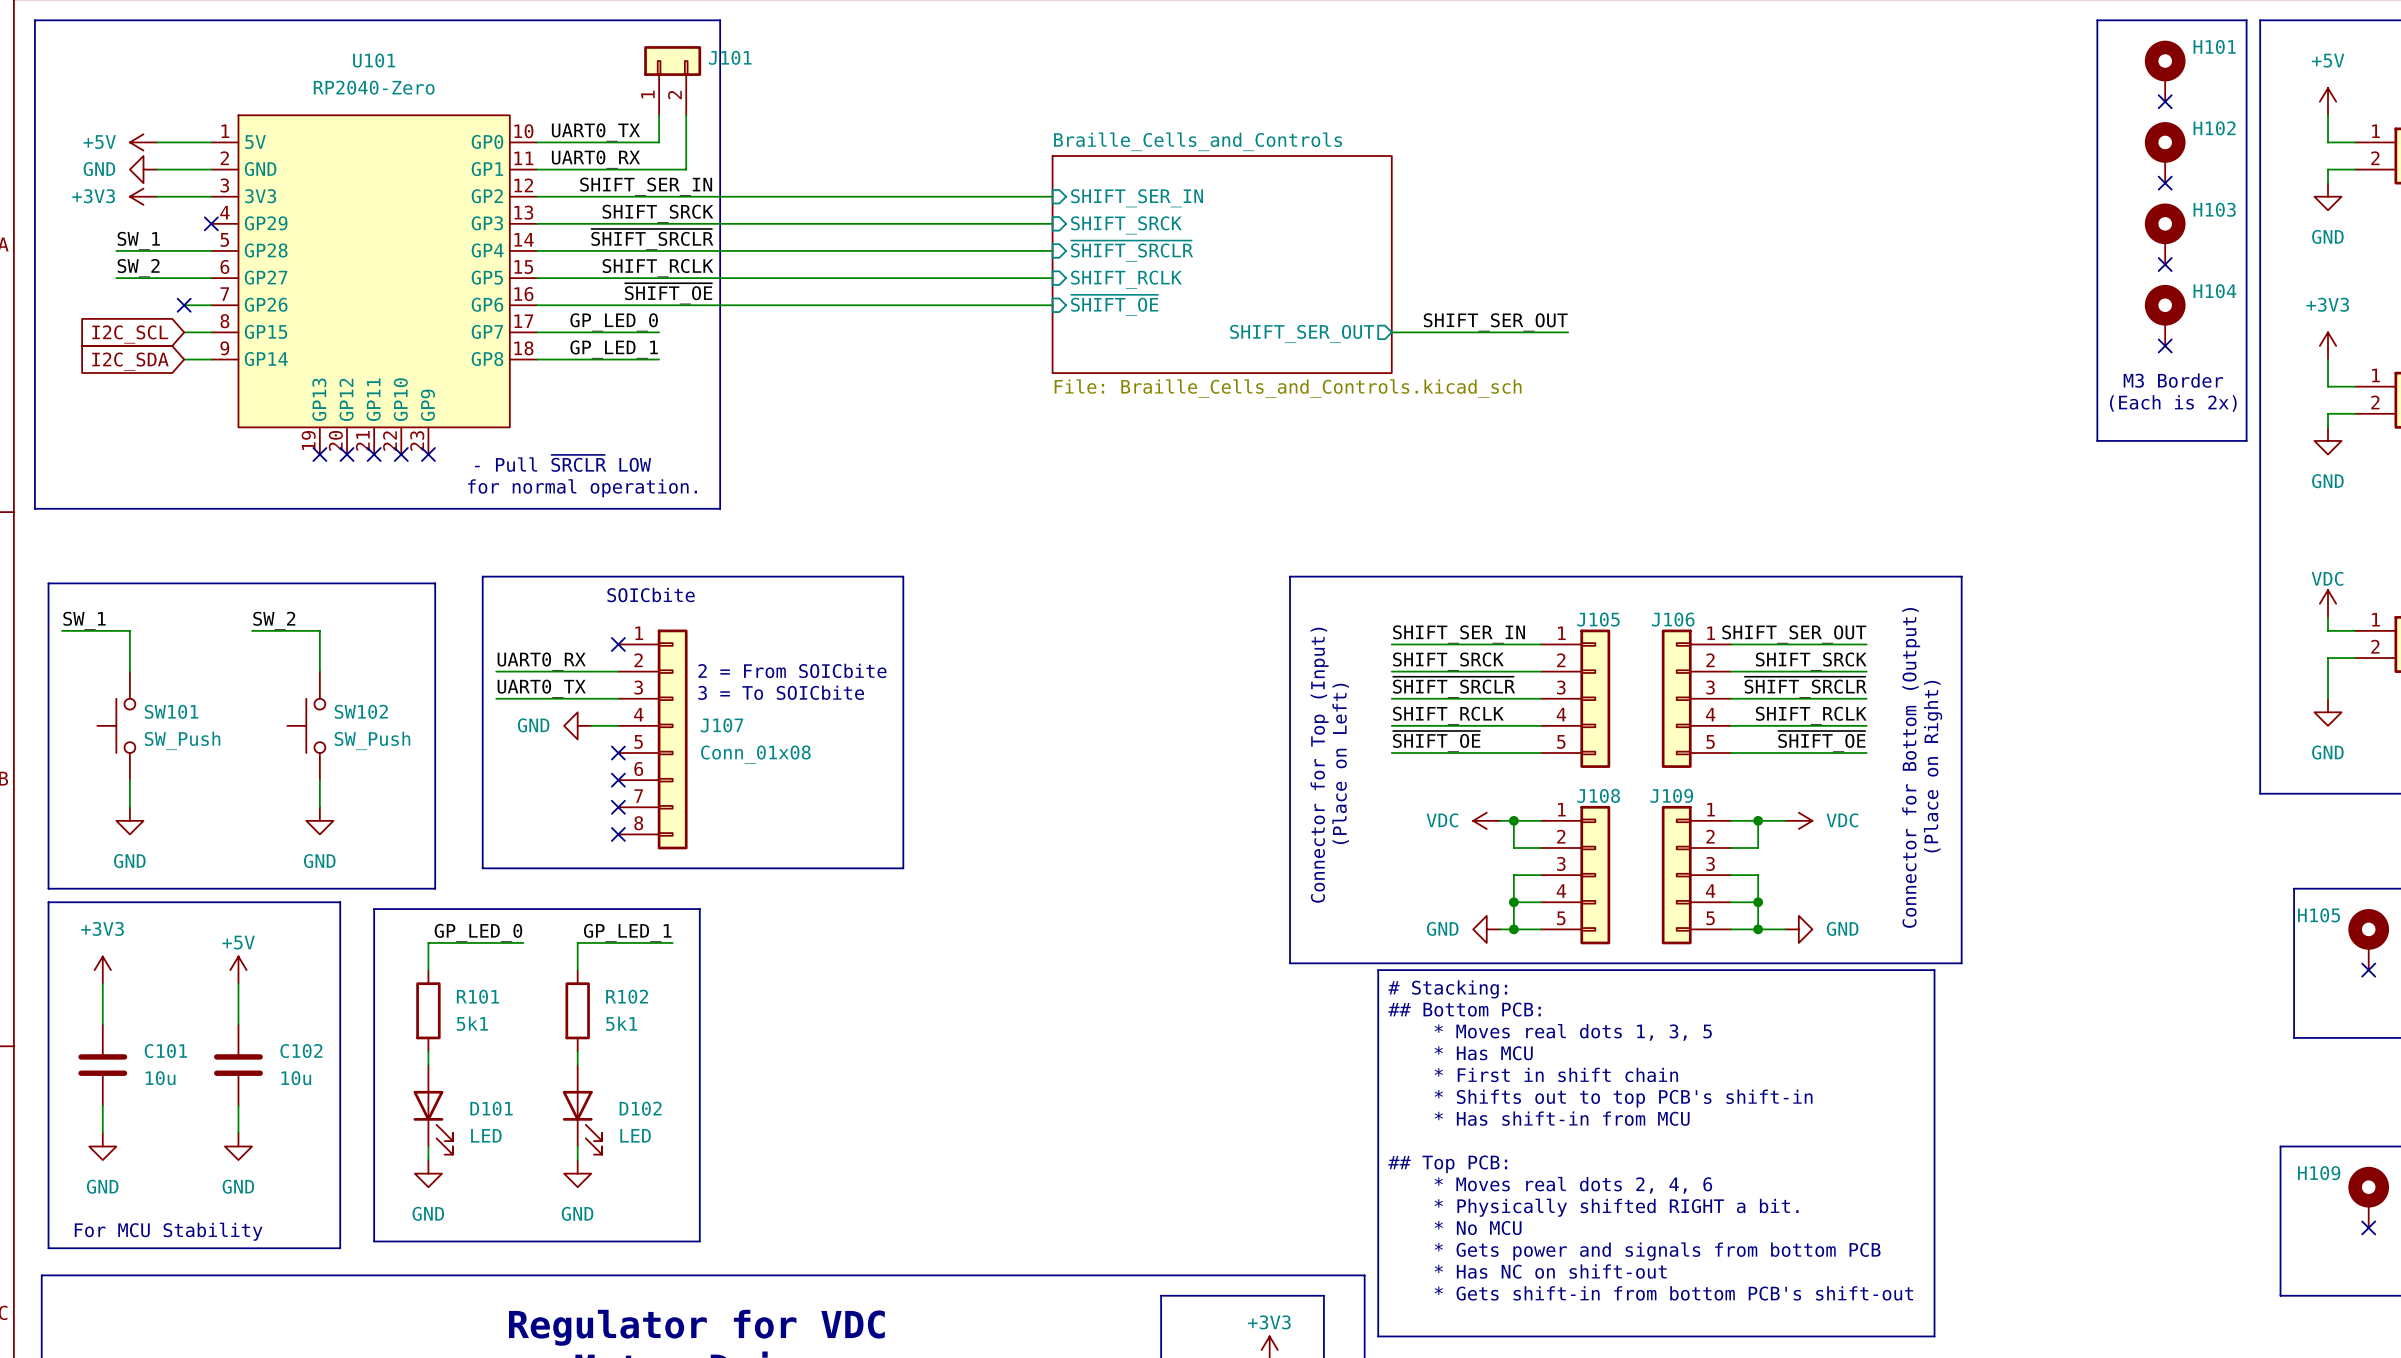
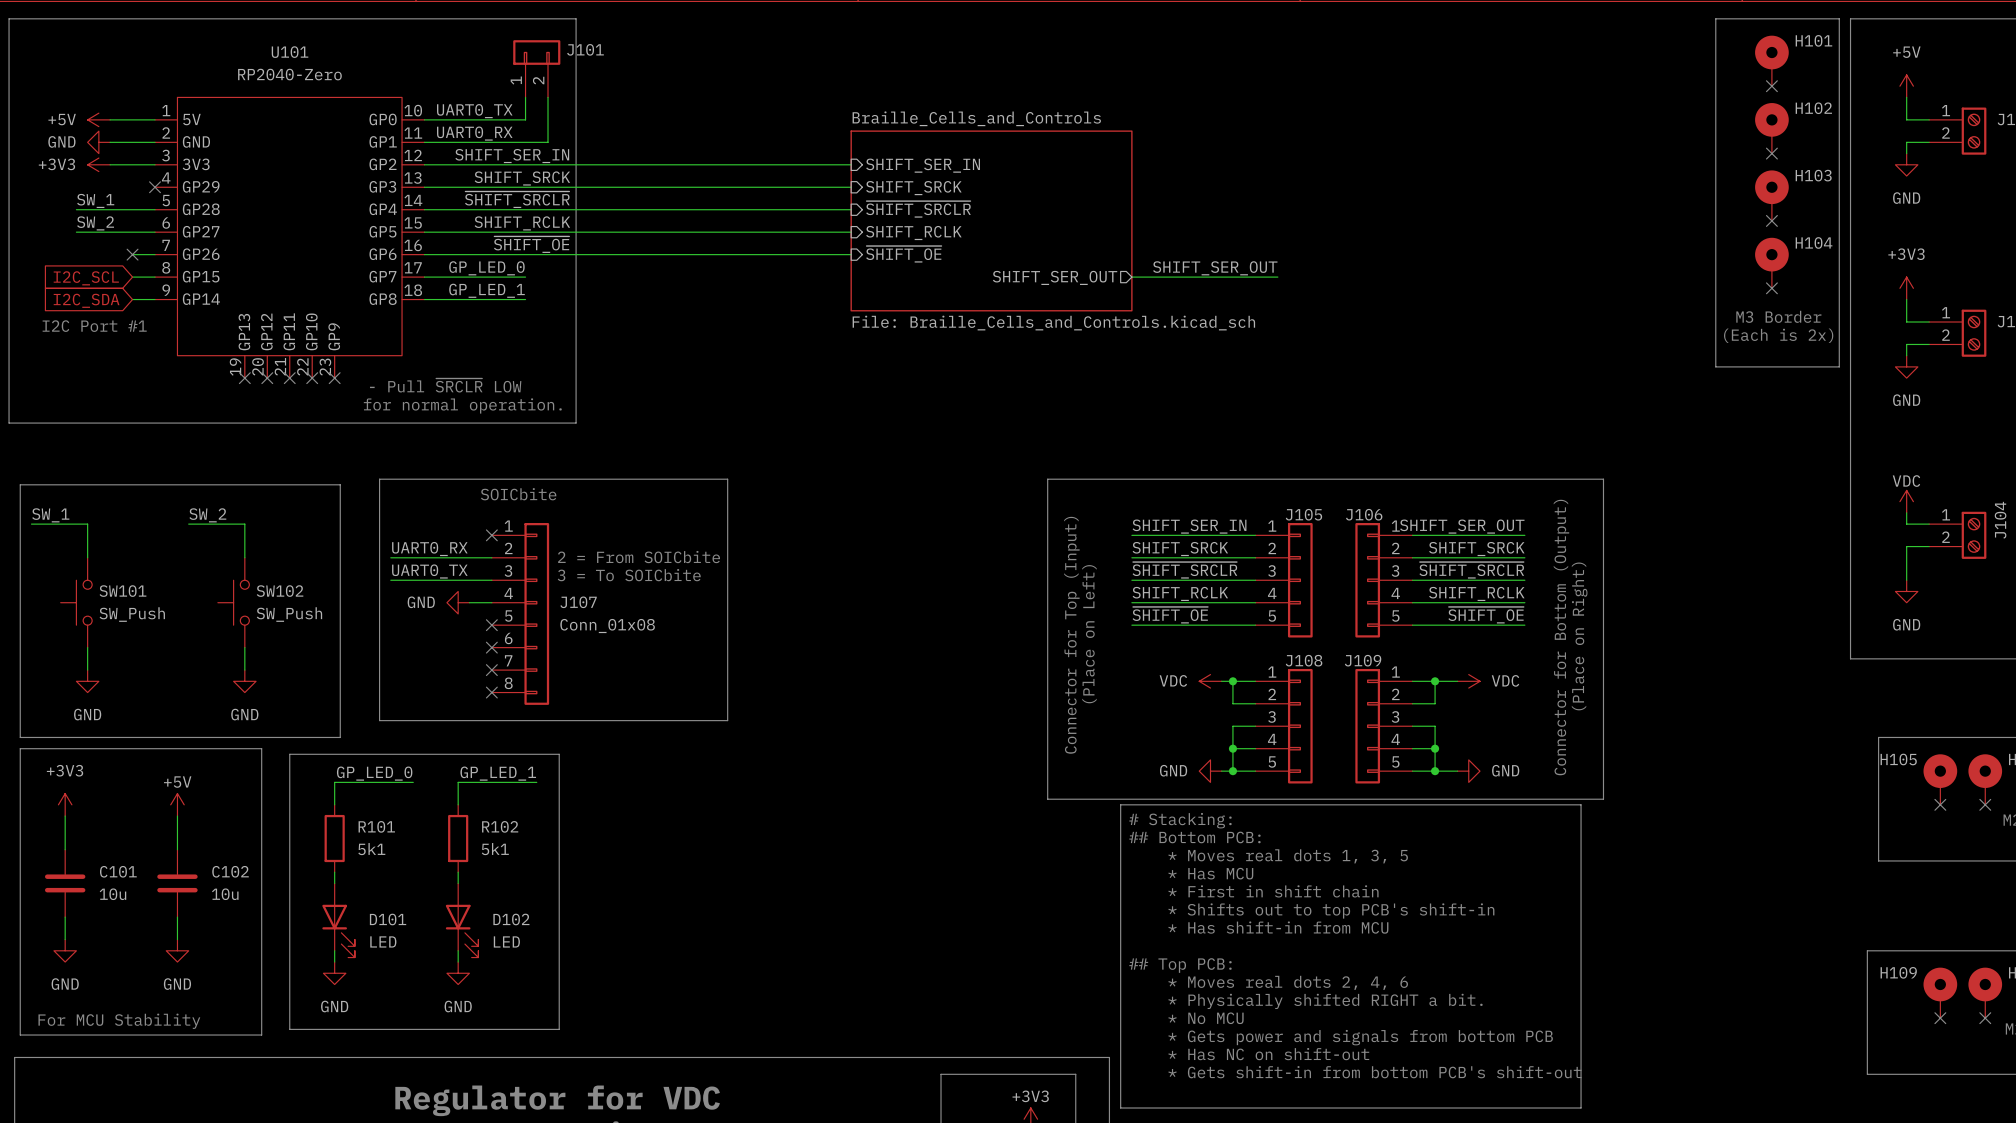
text: none -> I2C Port #1 (94, 326)

